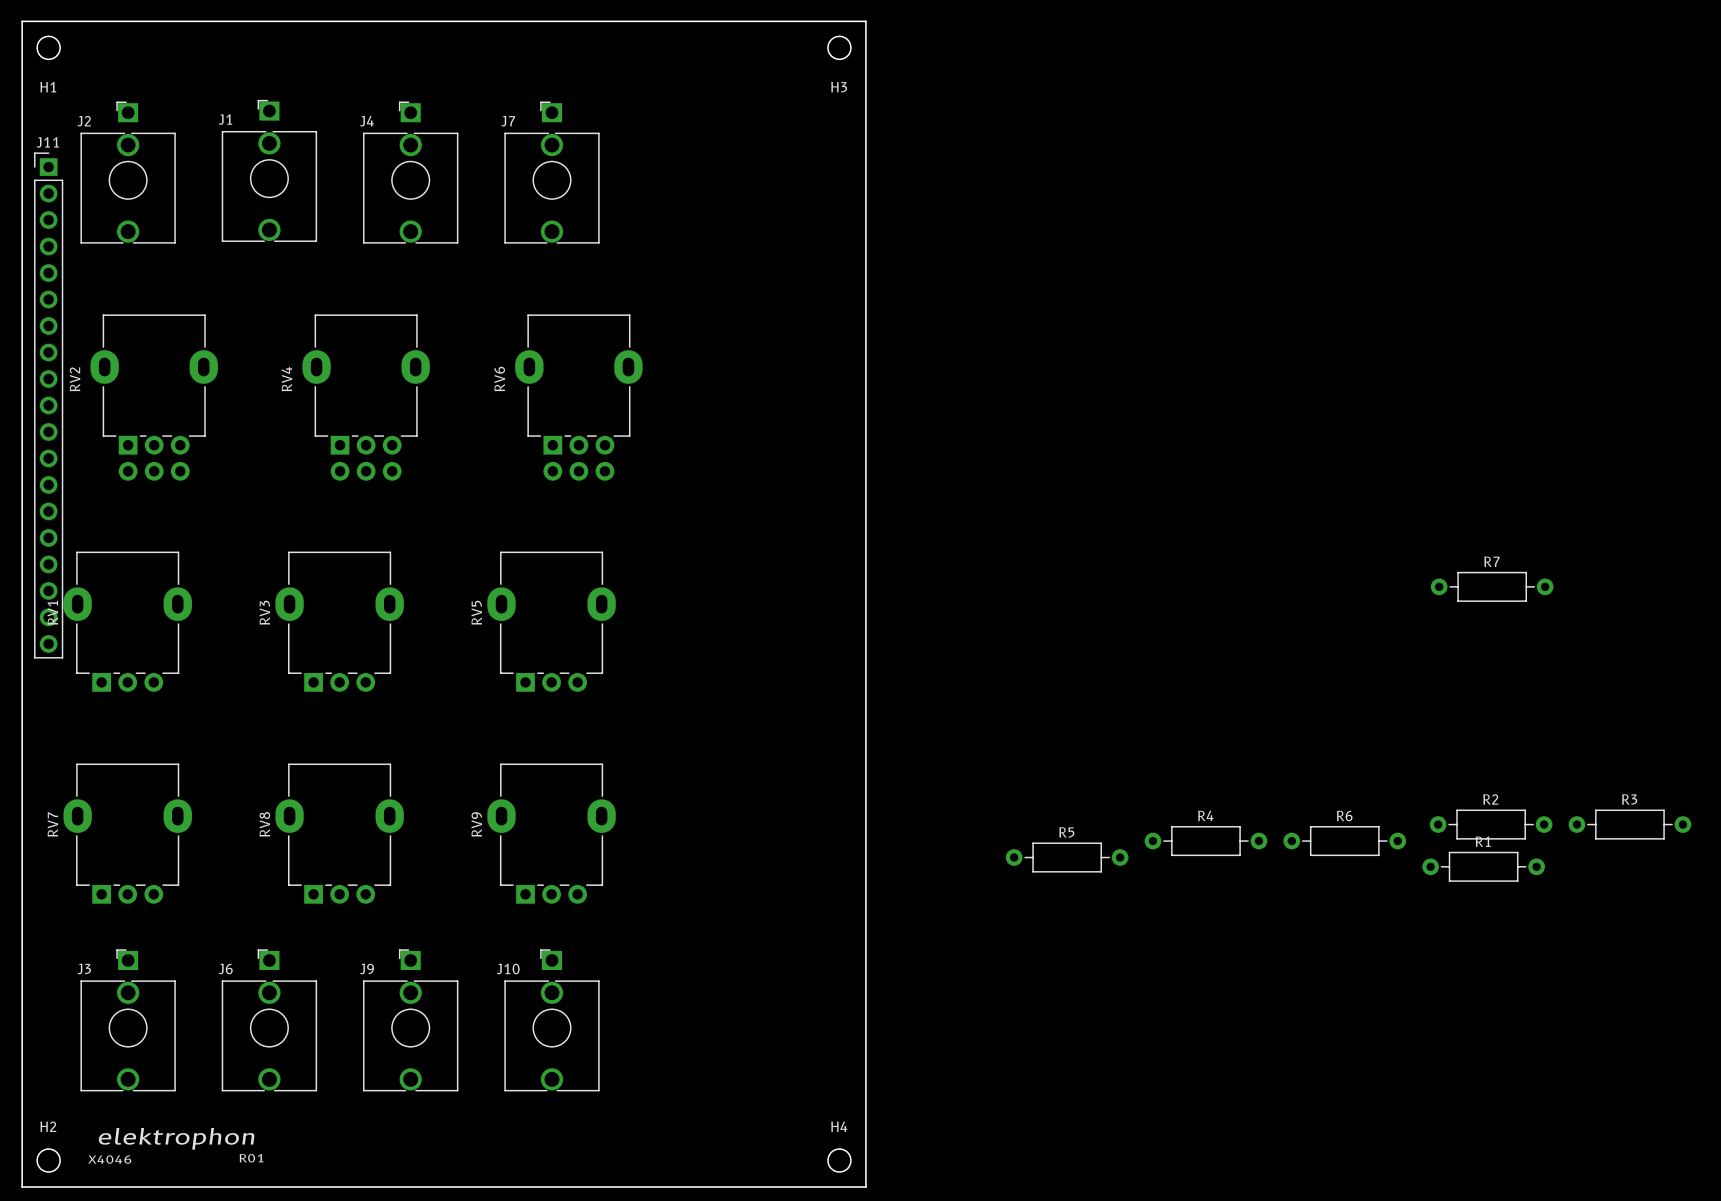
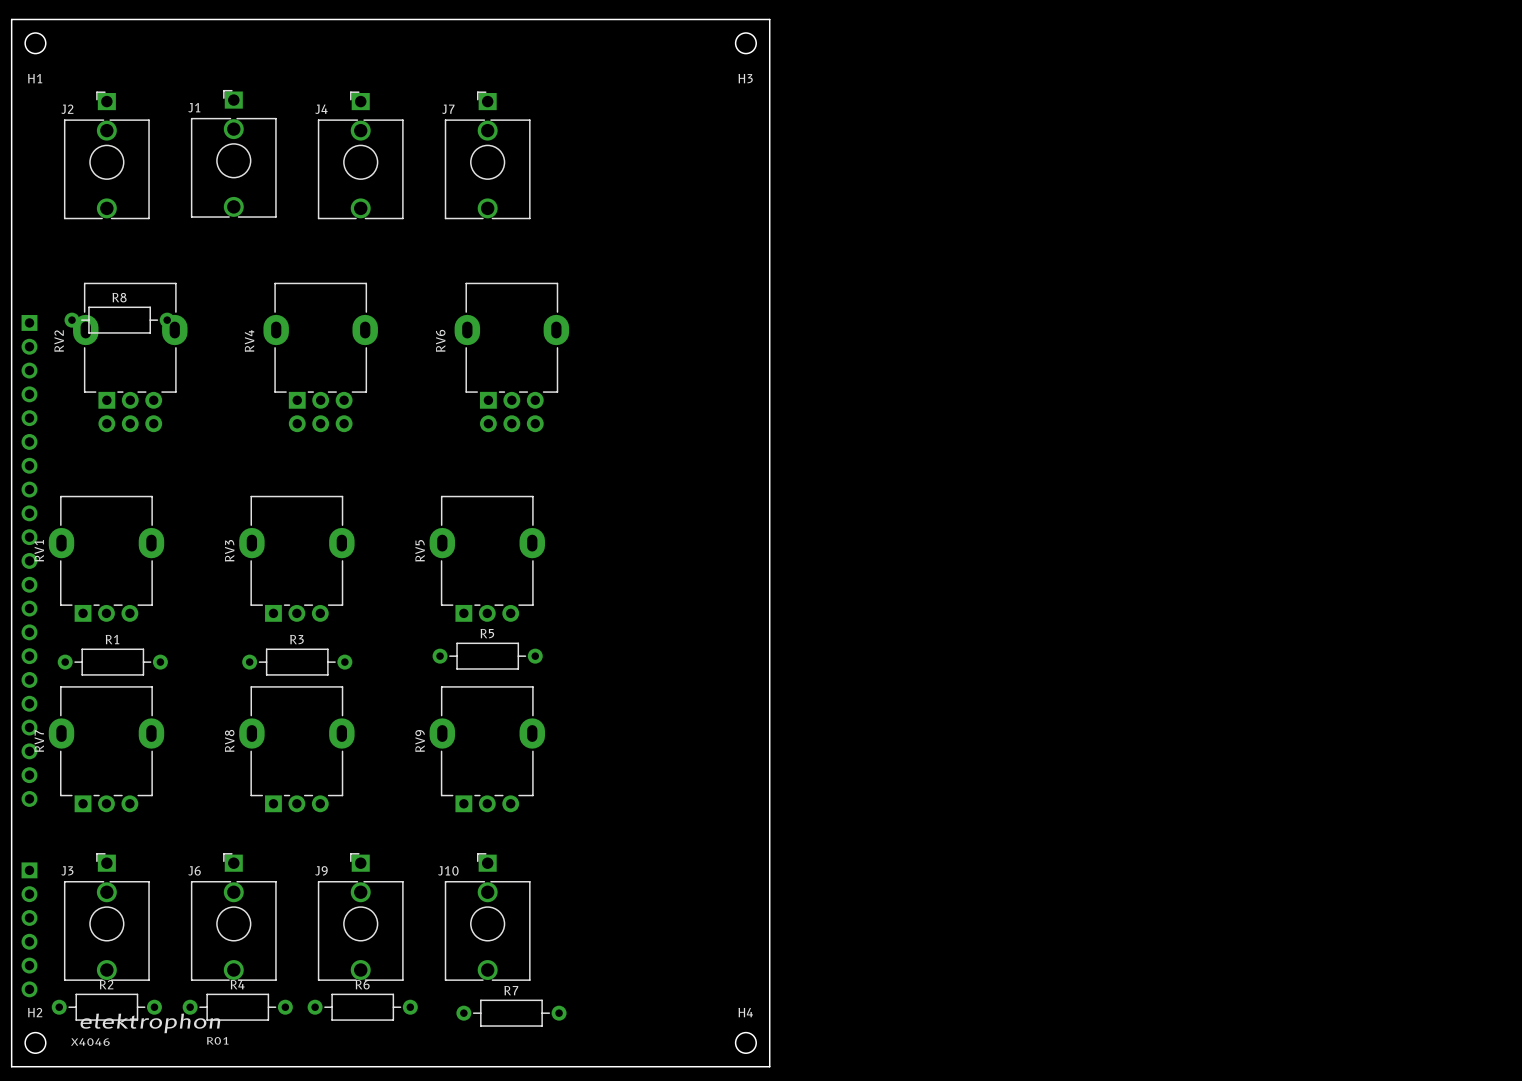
R8: none -> (119, 320)
J11: (48, 405) -> none
R7 position: (1492, 586) -> (511, 1013)
part: none -> (29, 560)
R2 position: (1491, 824) -> (106, 1007)
R3 position: (1629, 824) -> (297, 662)
R4 position: (1205, 841) -> (237, 1007)
R6 position: (1344, 841) -> (362, 1007)
R5 position: (1067, 857) -> (487, 656)
R1 position: (1483, 866) -> (112, 662)
part: none -> (29, 929)

